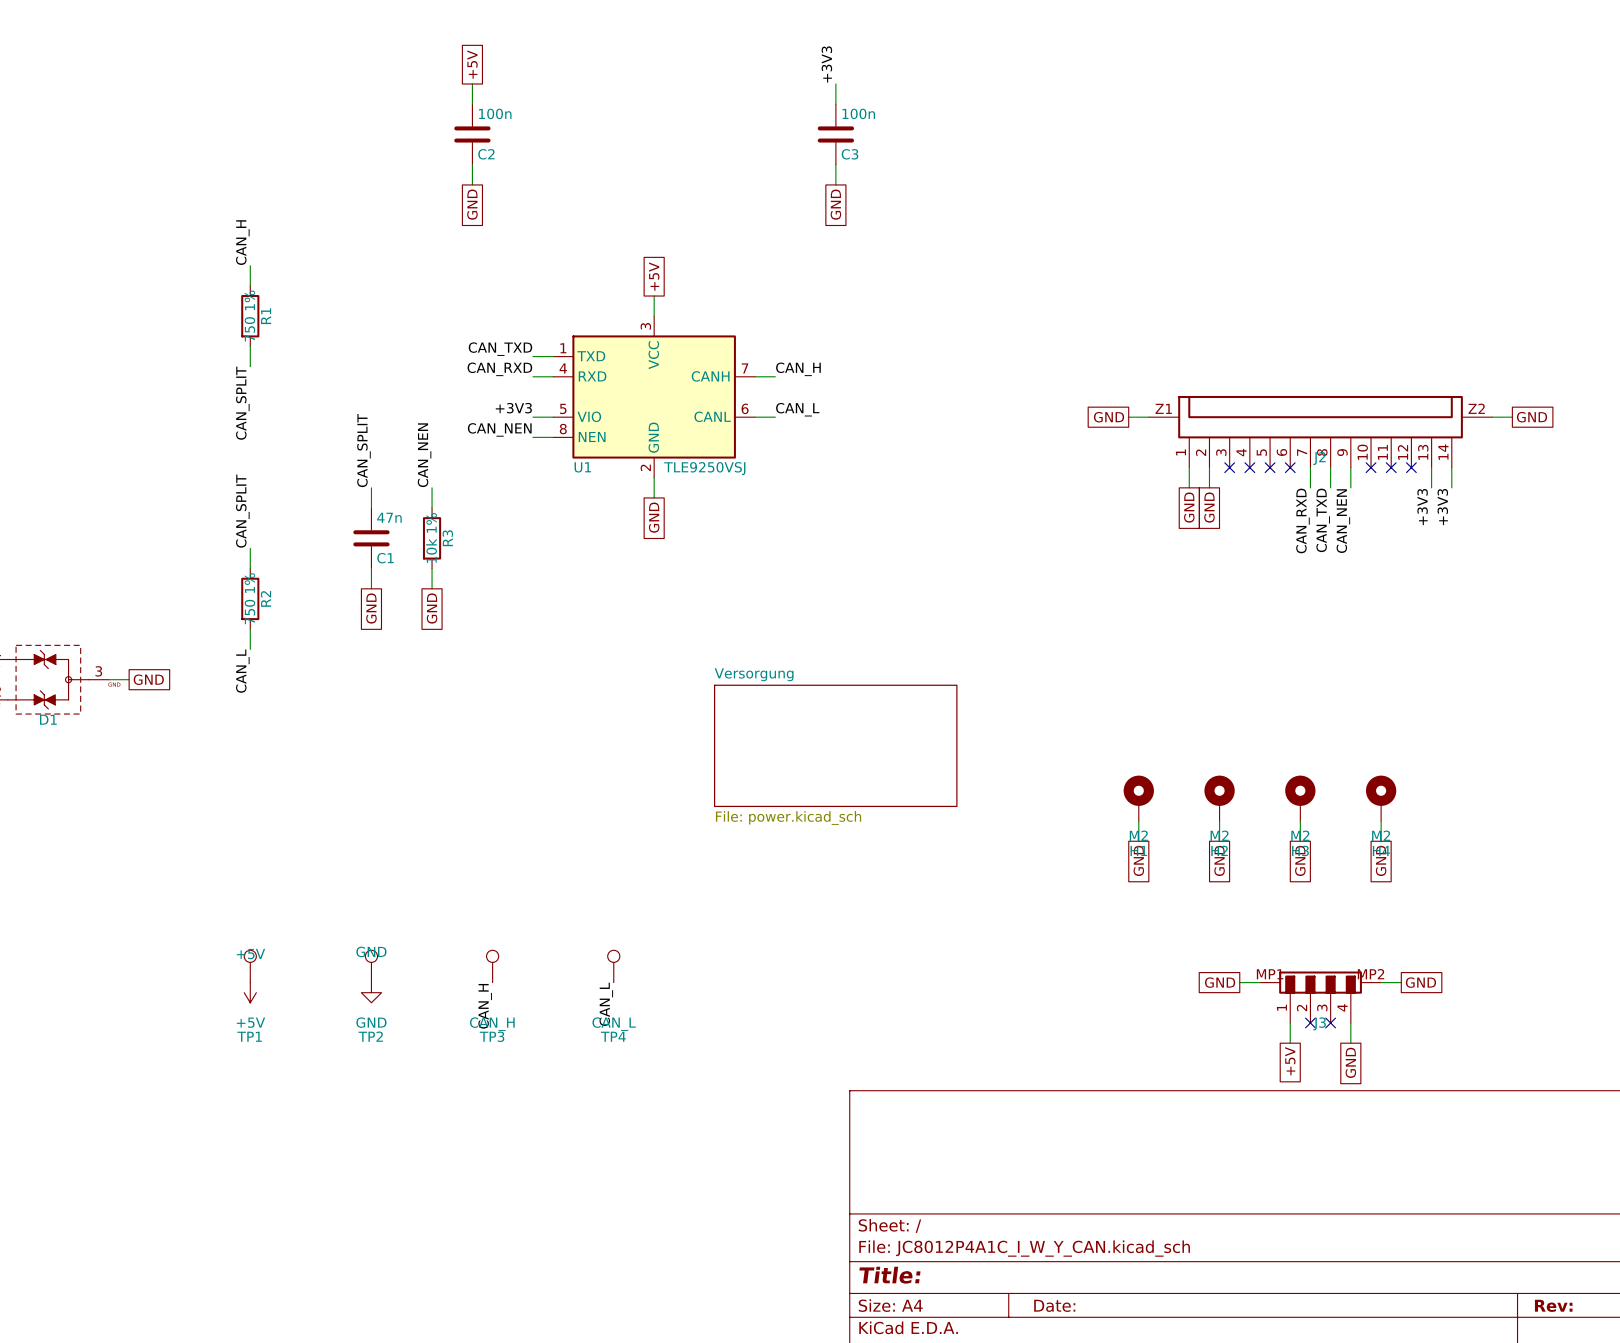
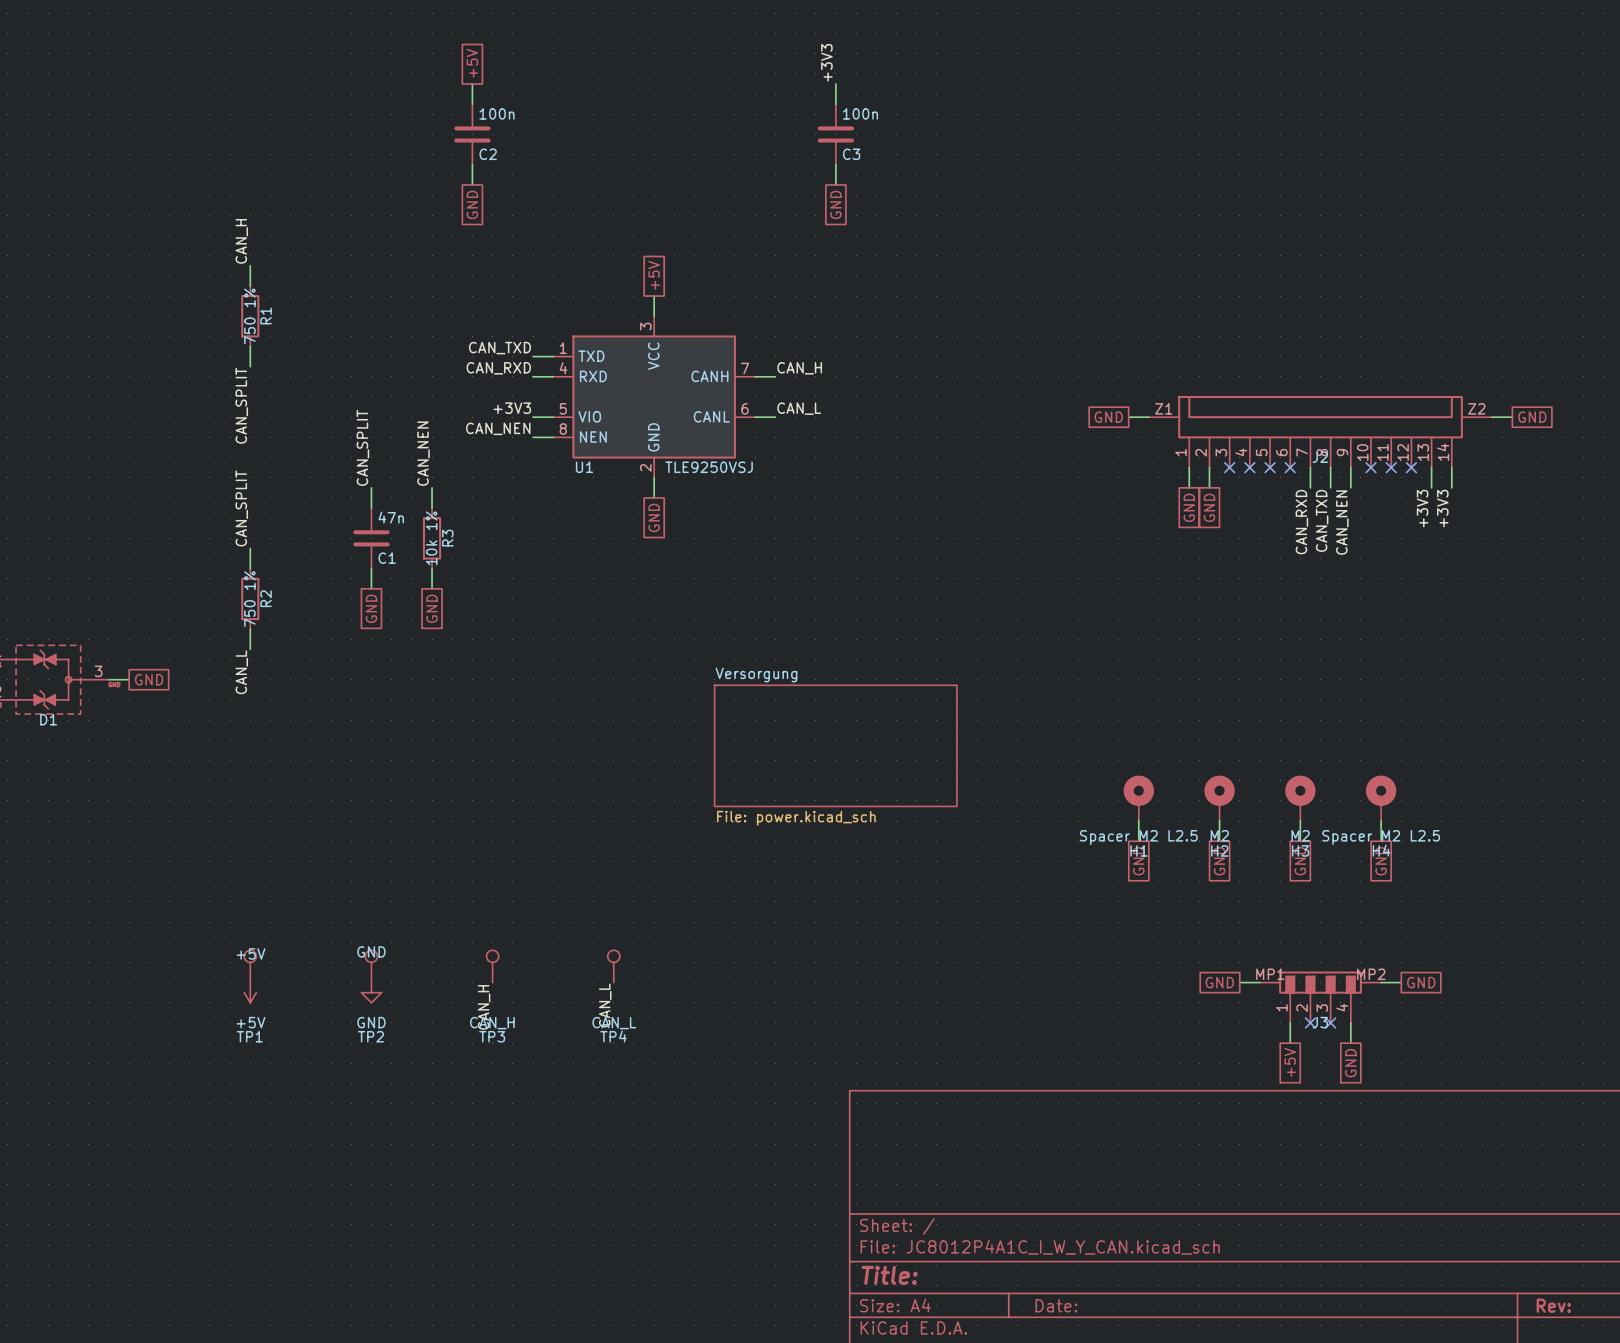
H1 value: M2 (1138, 835) -> Spacer M2 L2.5 (1138, 837)
H4 value: M2 (1381, 835) -> Spacer M2 L2.5 (1381, 837)

